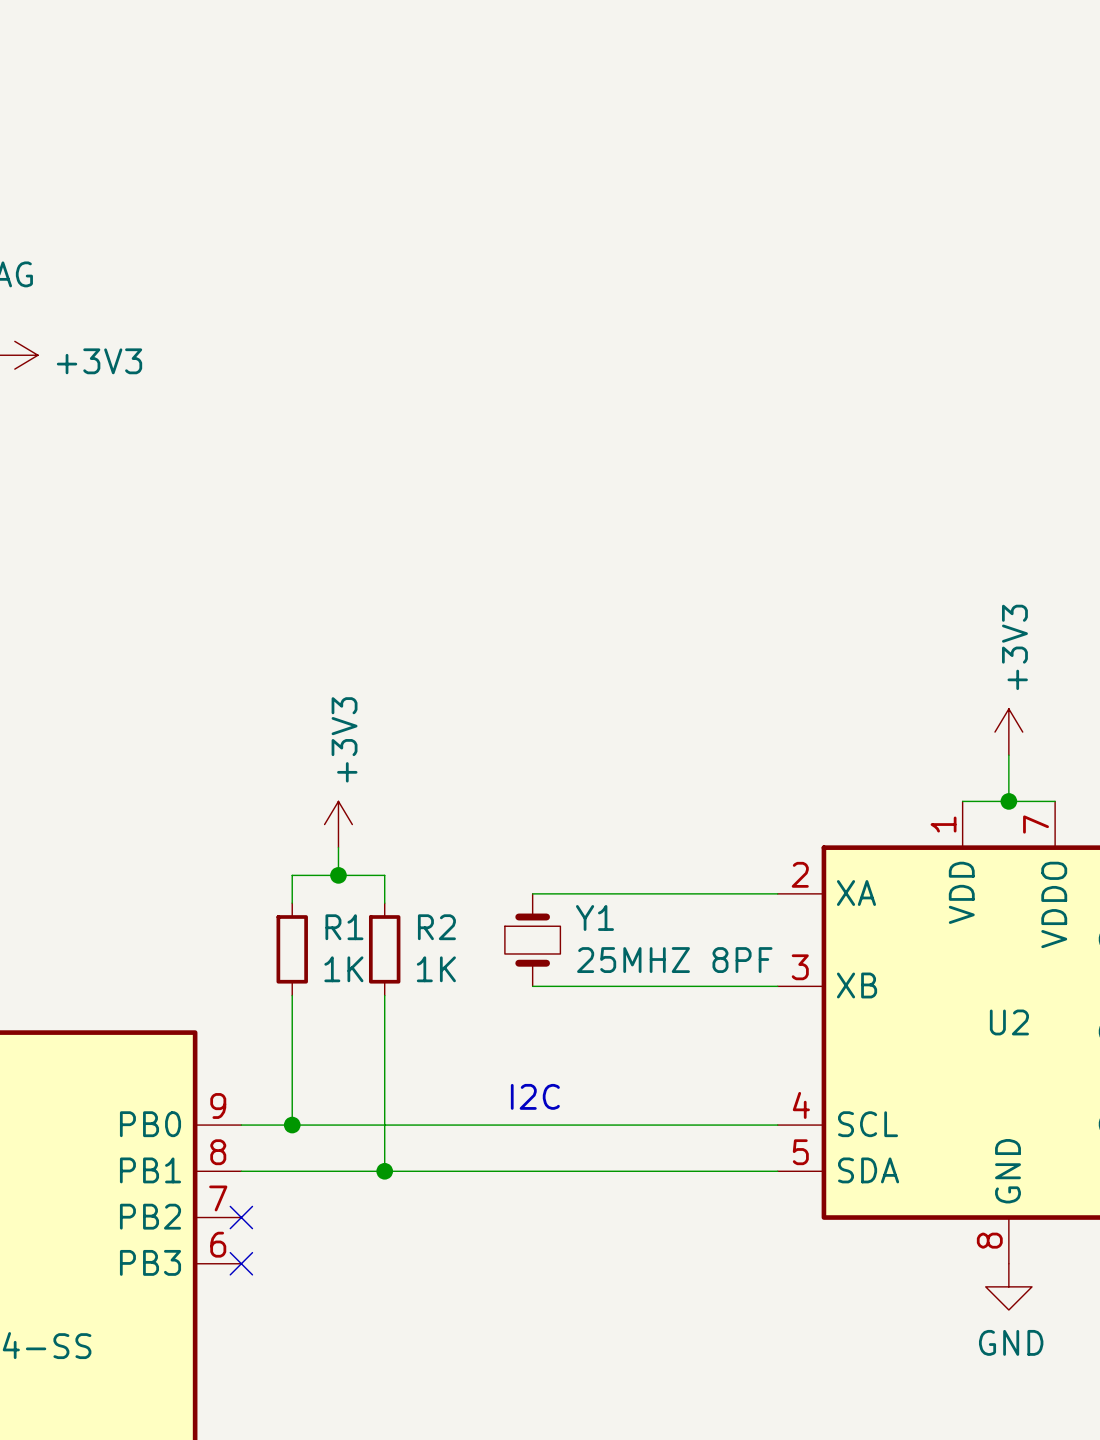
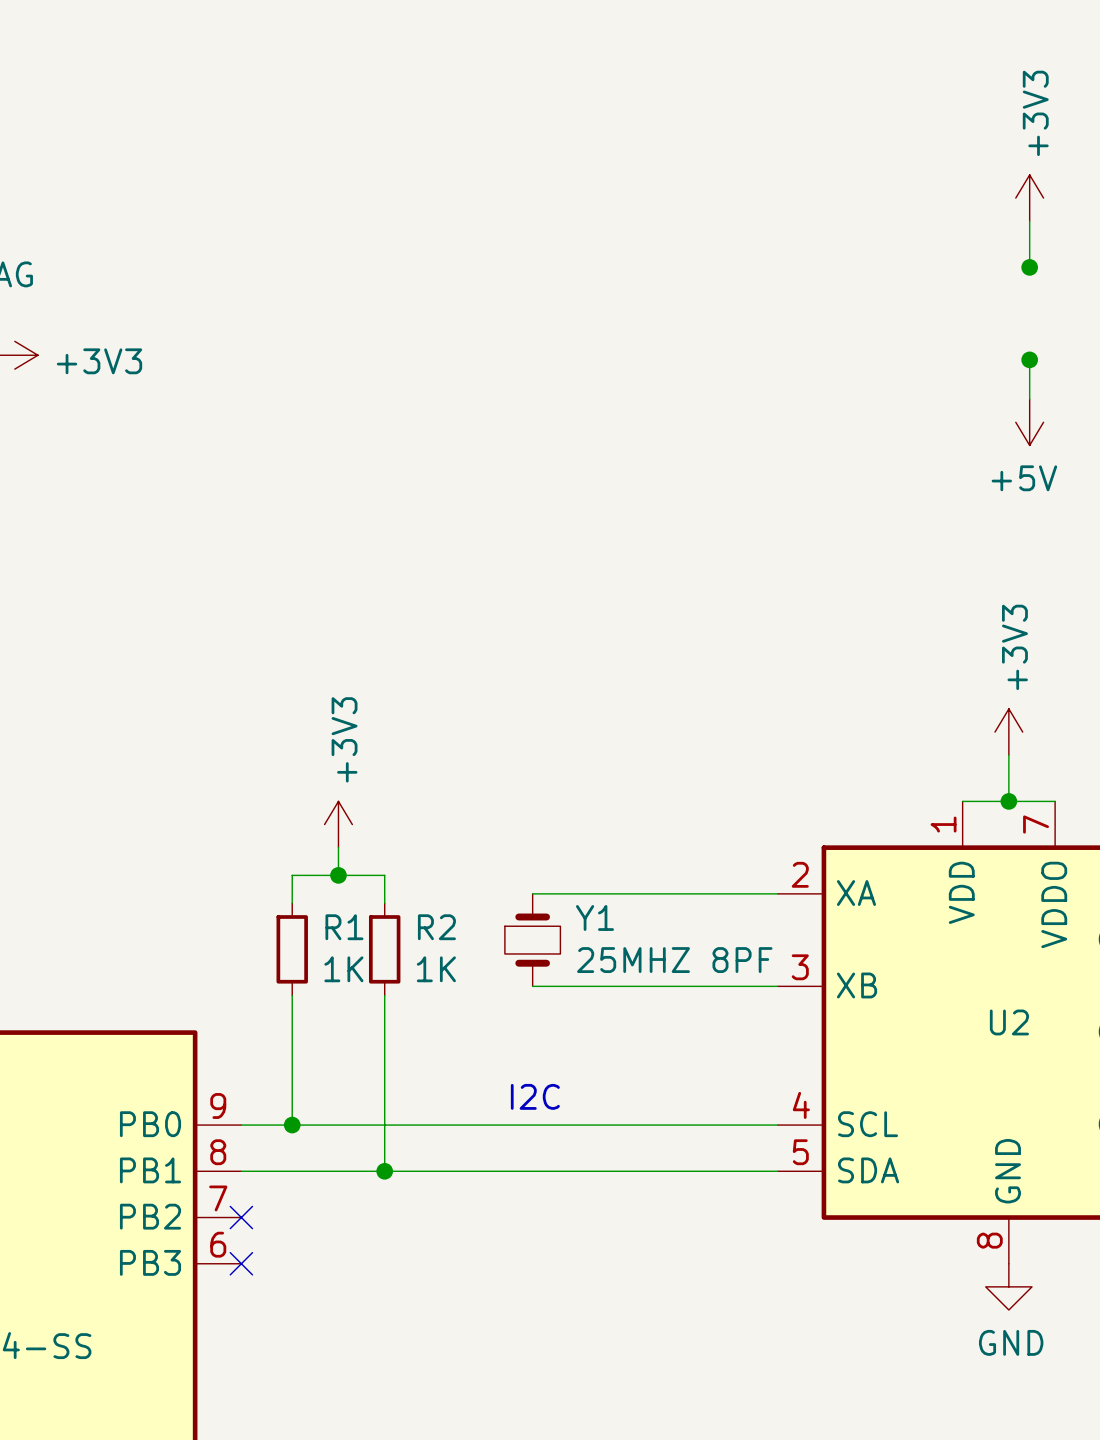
power symbol: none -> +3V3 (1029, 198)
wire: none -> (1029, 221) (1029, 267)
junction: none -> (1029, 267)
wire: none -> (1029, 359) (1029, 399)
junction: none -> (1029, 359)
power symbol: none -> +5V (1029, 422)

